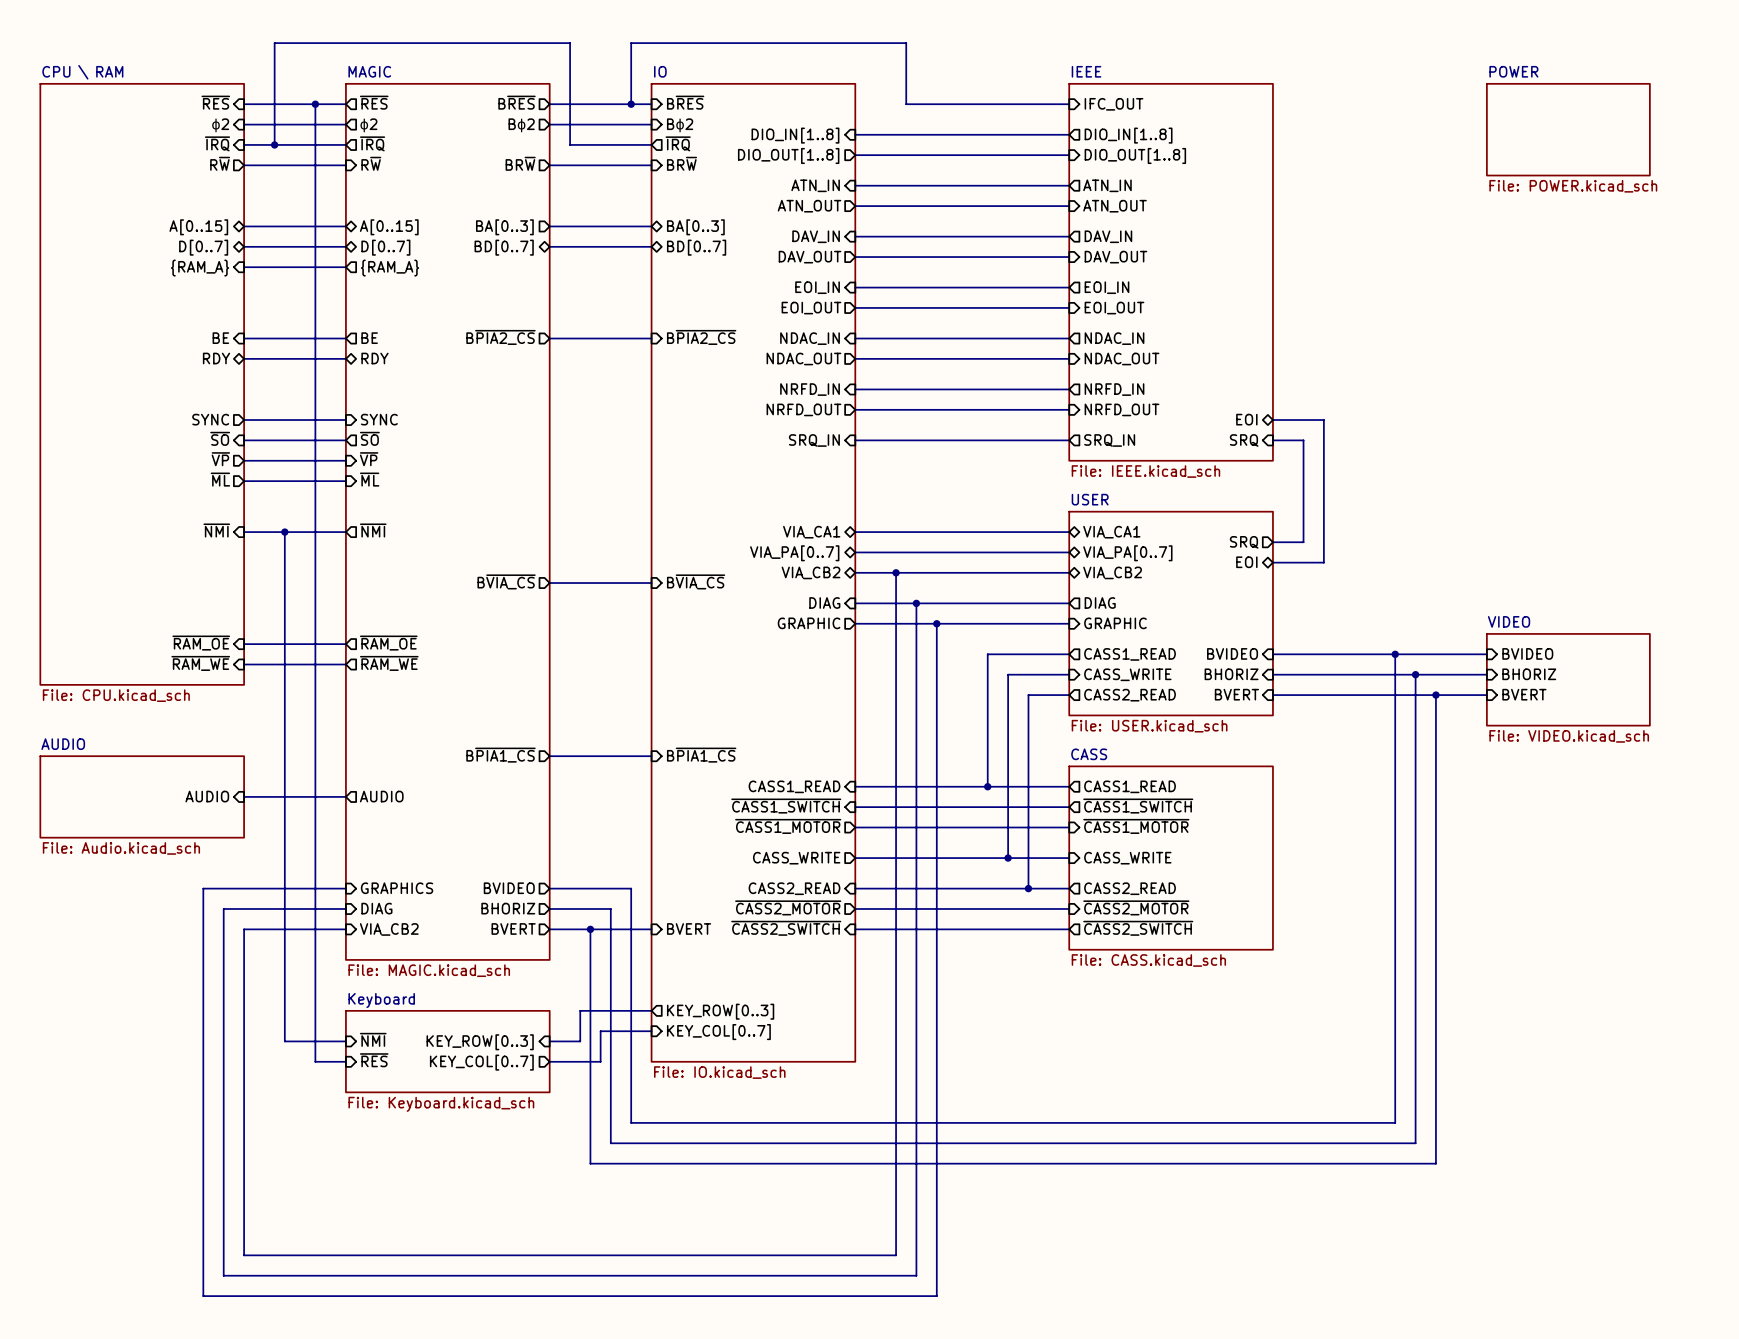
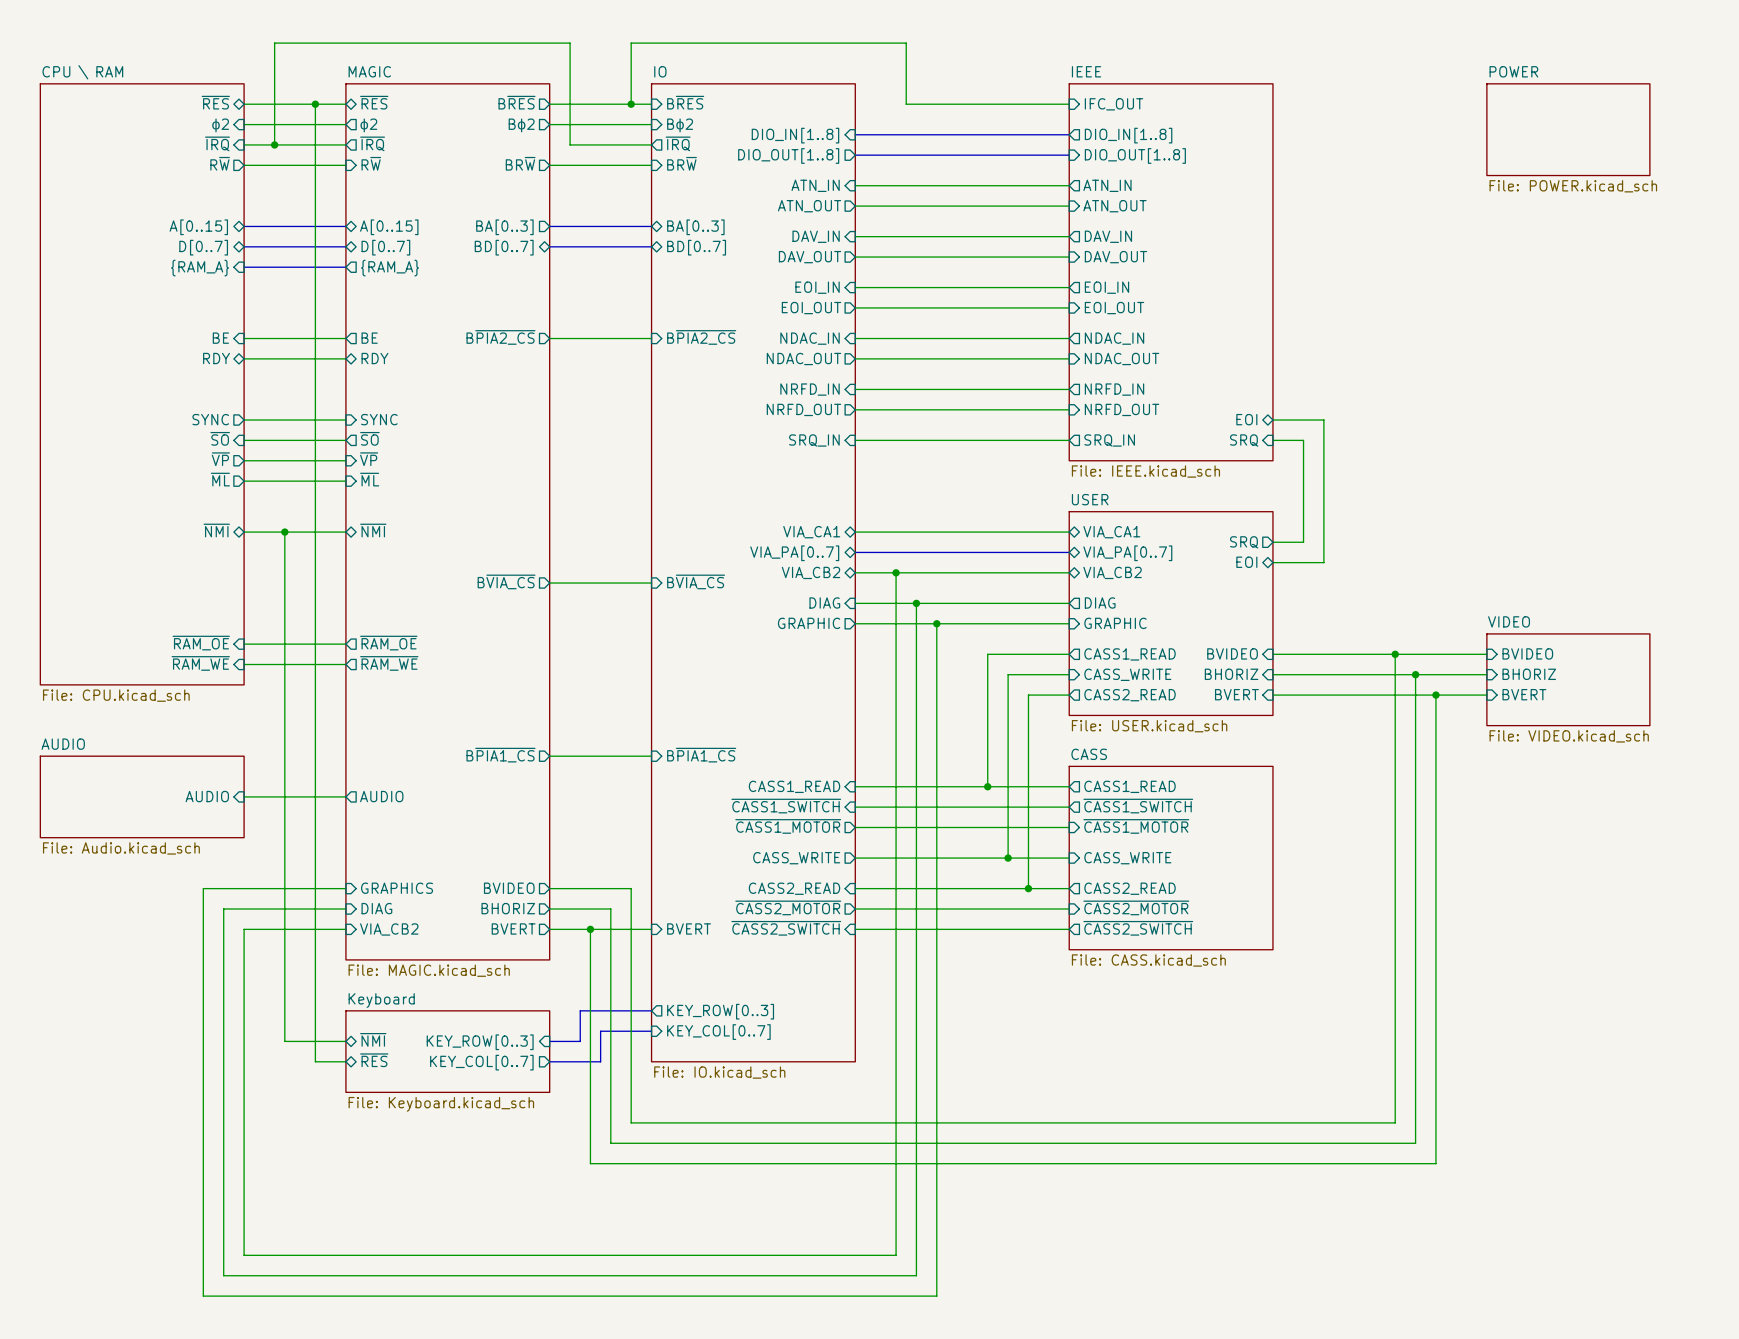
sheet pin shape: input (215, 102) -> bidirectional (215, 102)
sheet pin shape: output (374, 102) -> bidirectional (374, 102)
sheet pin shape: input (216, 530) -> bidirectional (216, 530)
sheet pin shape: output (373, 530) -> bidirectional (373, 530)
sheet pin shape: input (373, 1039) -> bidirectional (373, 1039)
sheet pin shape: input (374, 1060) -> bidirectional (374, 1060)

